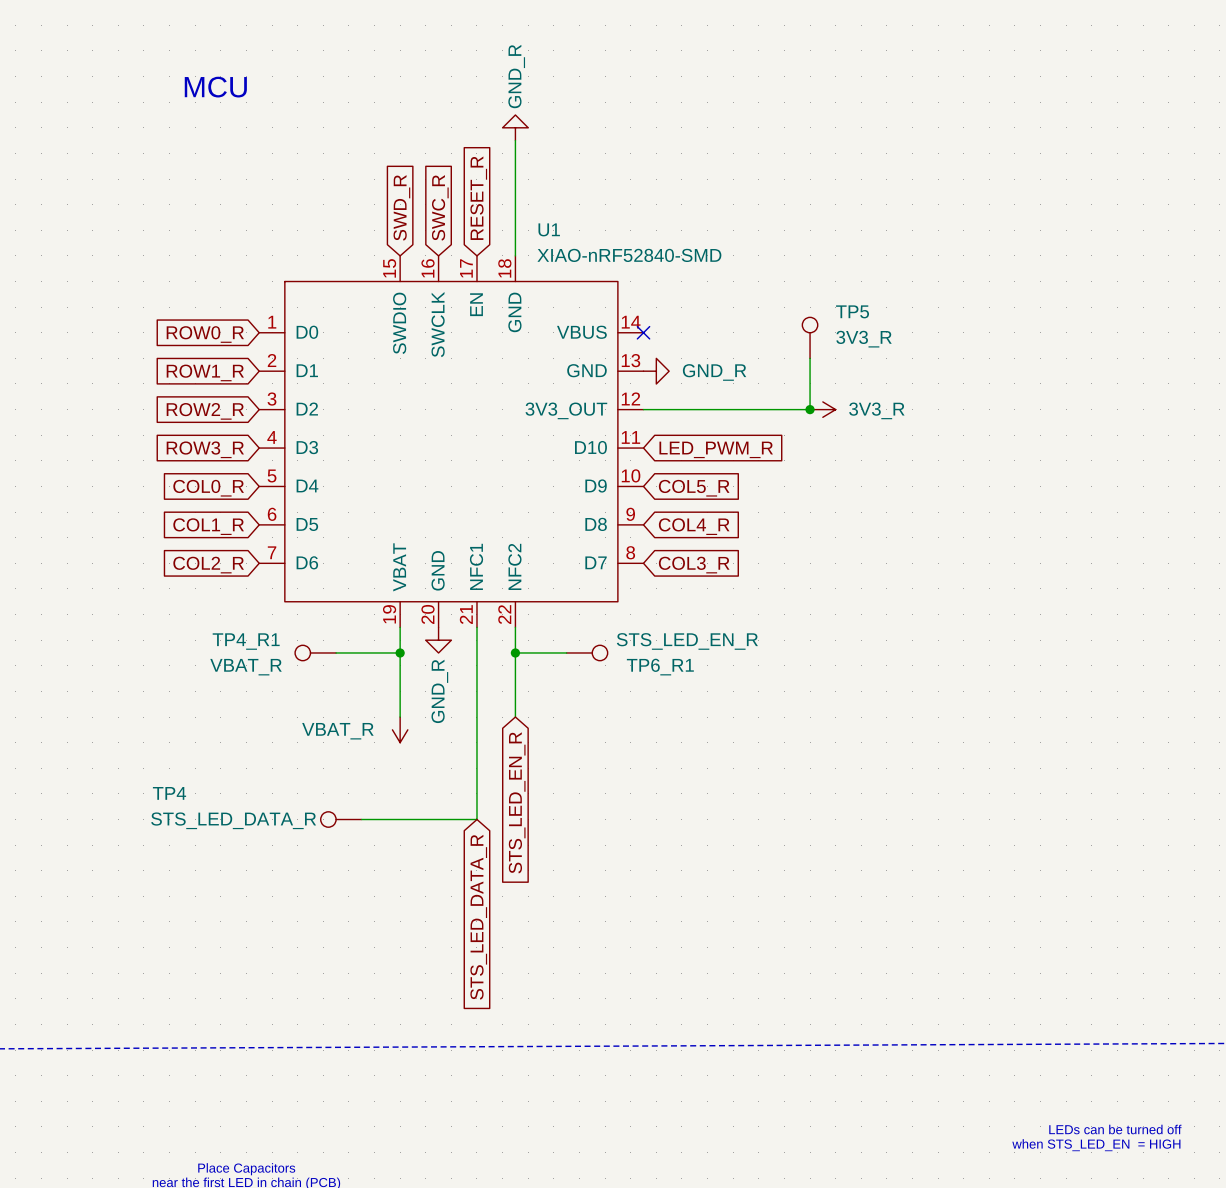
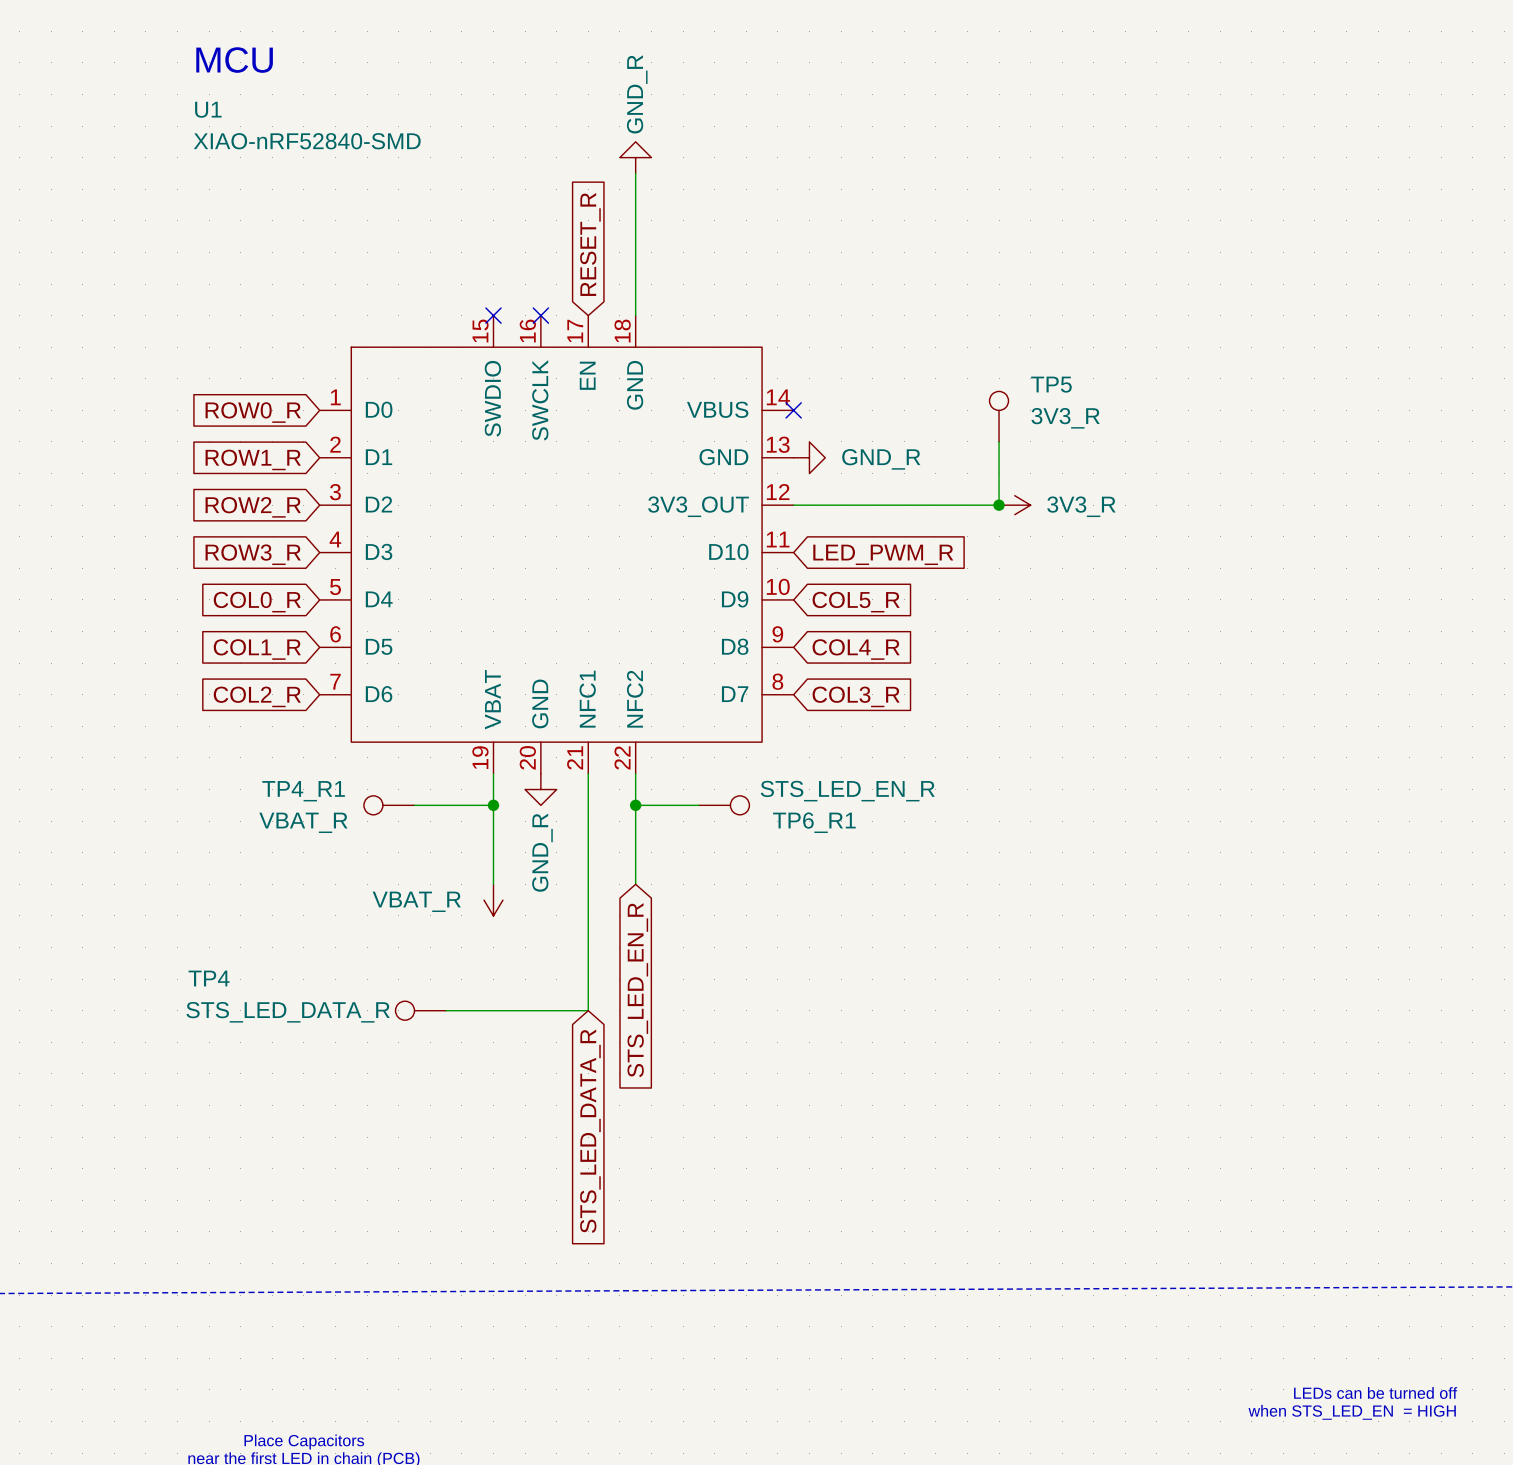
text position: MCU (215, 87) -> MCU (234, 60)
global label: SWD_R (401, 207) -> none
global label: SWC_R (440, 207) -> none
U1 name position: U1 (549, 229) -> U1 (208, 109)
no-connect mark: none -> (493, 315)
no-connect mark: none -> (540, 315)
U1 value position: XIAO-nRF52840-SMD (629, 255) -> XIAO-nRF52840-SMD (307, 141)

